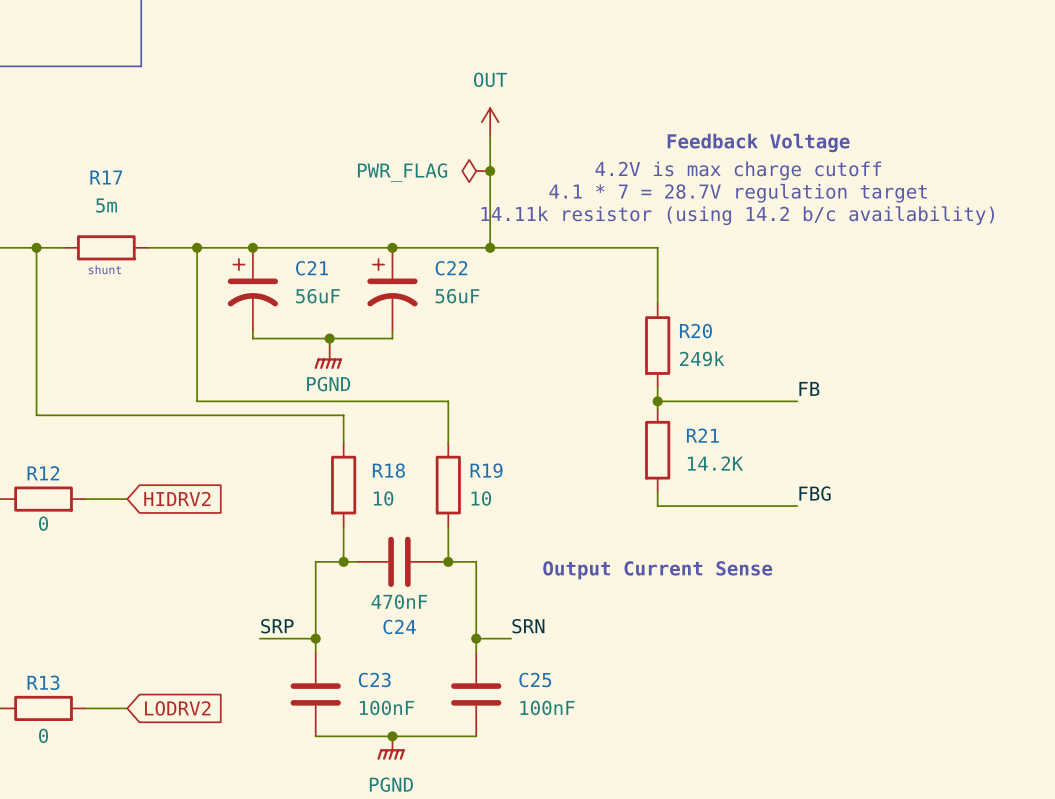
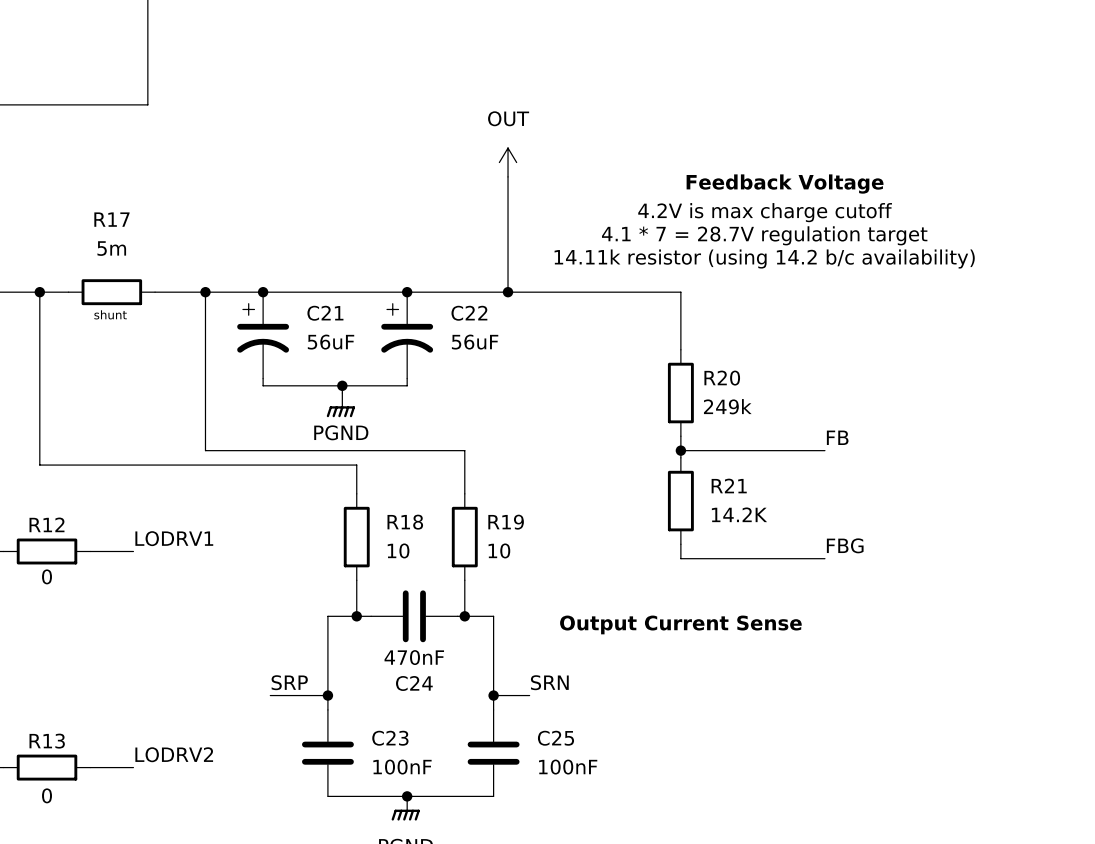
power symbol: PWR_FLAG (476, 171) -> none
junction: (490, 171) -> none
label: none -> LODRV1 (174, 538)
global label: HIDRV2 (177, 498) -> none
label: none -> LODRV2 (174, 754)
global label: LODRV2 (177, 708) -> none

